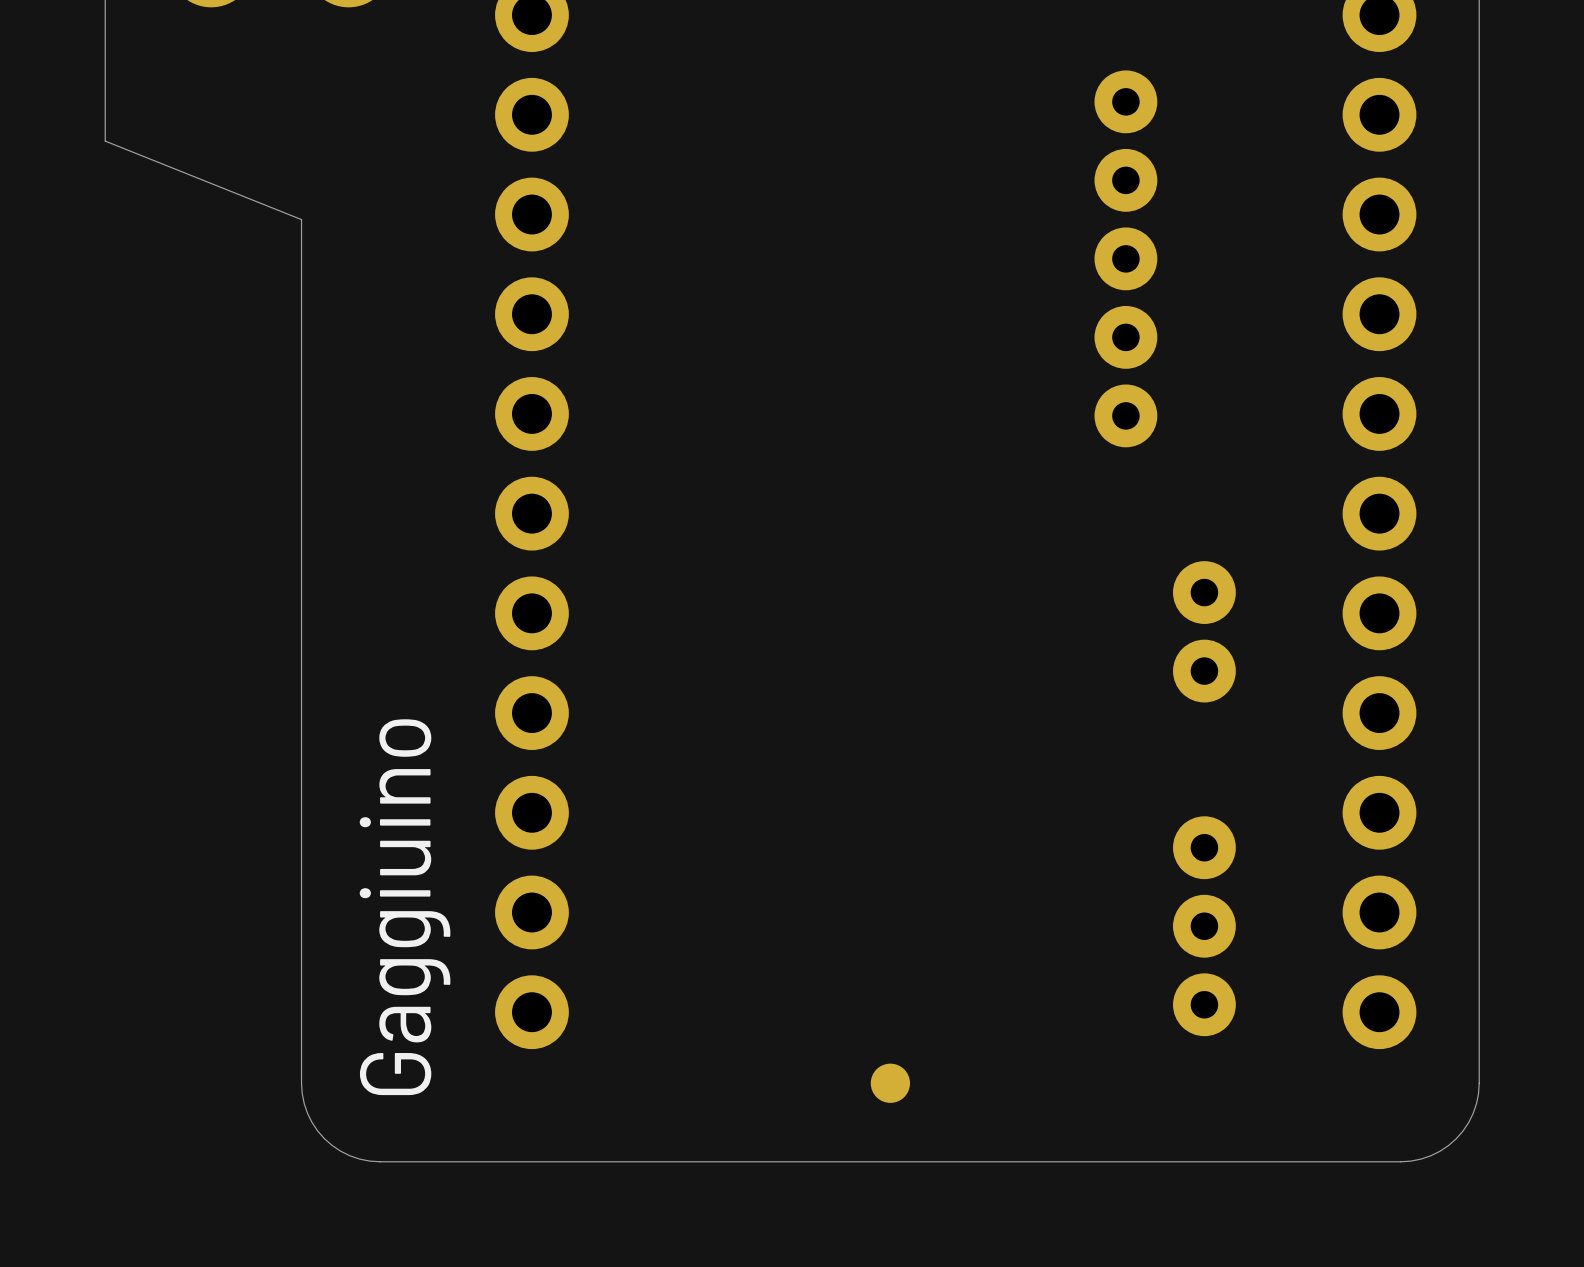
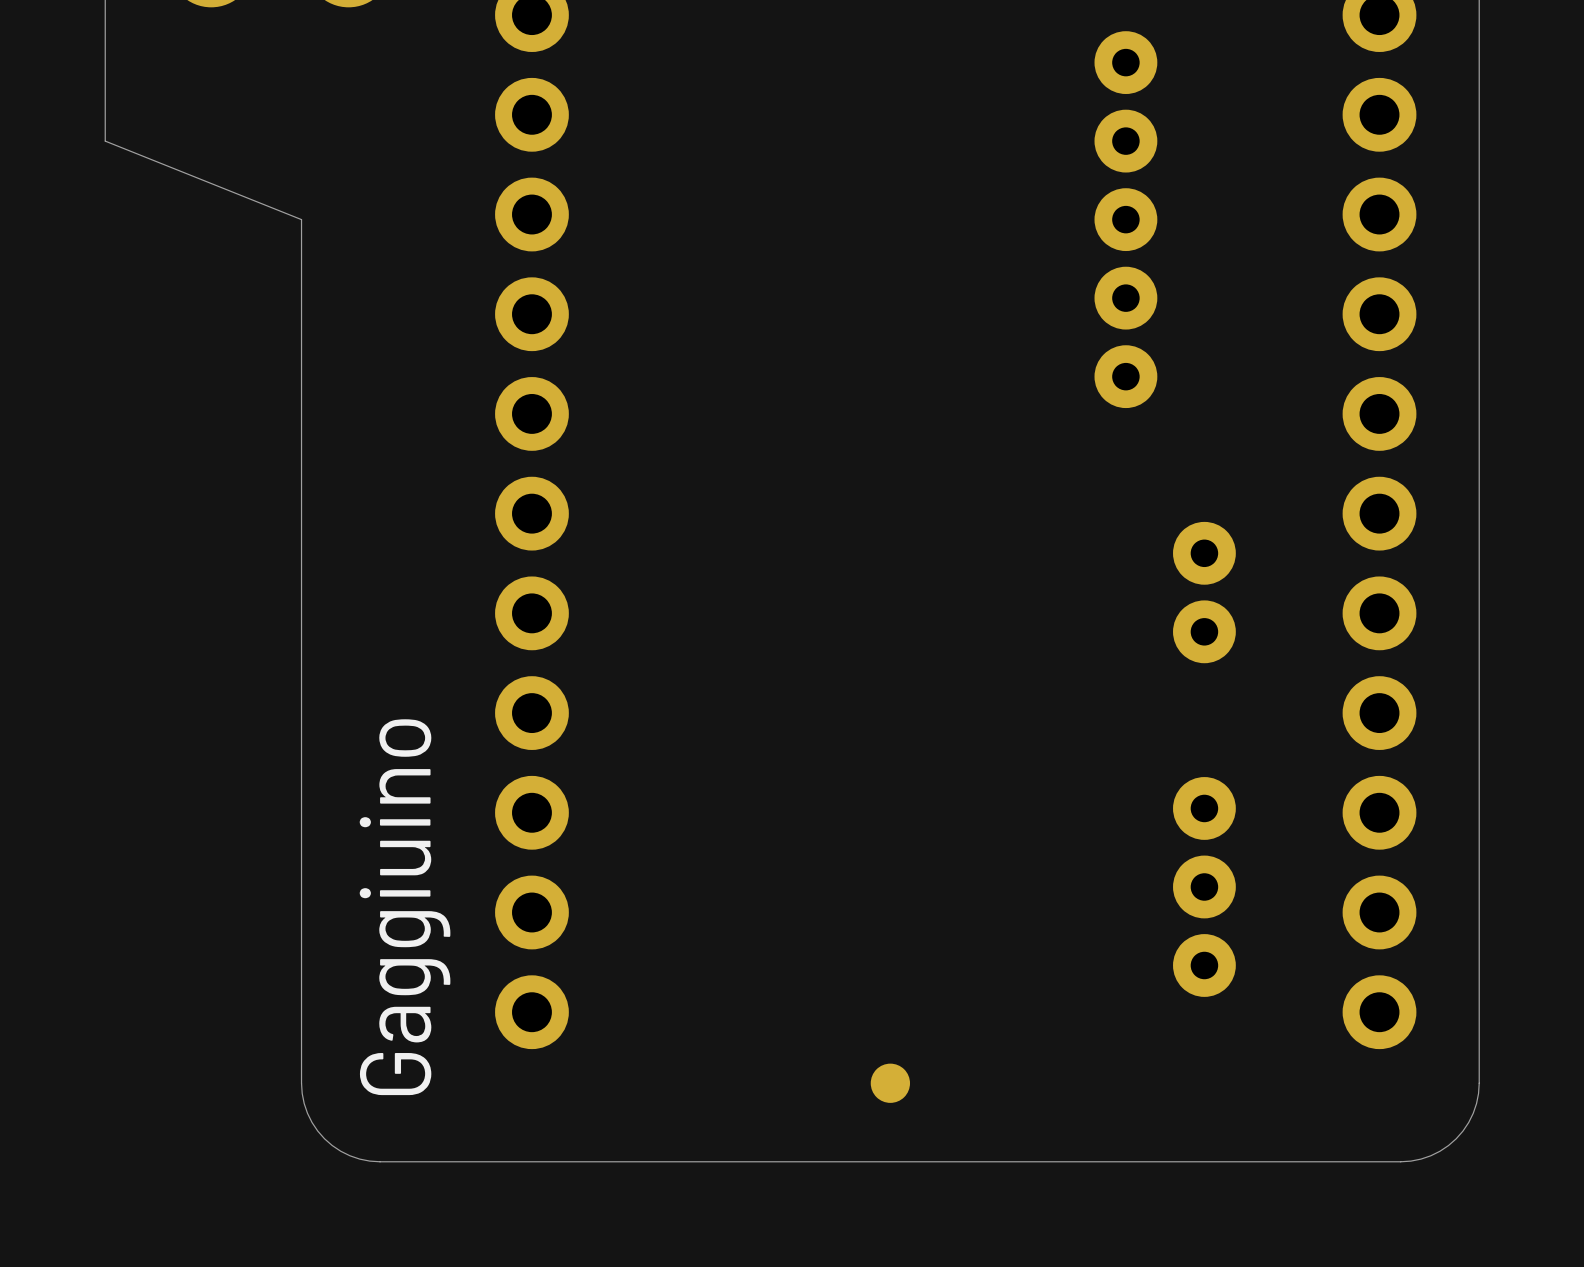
part position: (1125, 258) -> (1125, 219)
part position: (1204, 631) -> (1204, 592)
part position: (1204, 926) -> (1204, 886)

